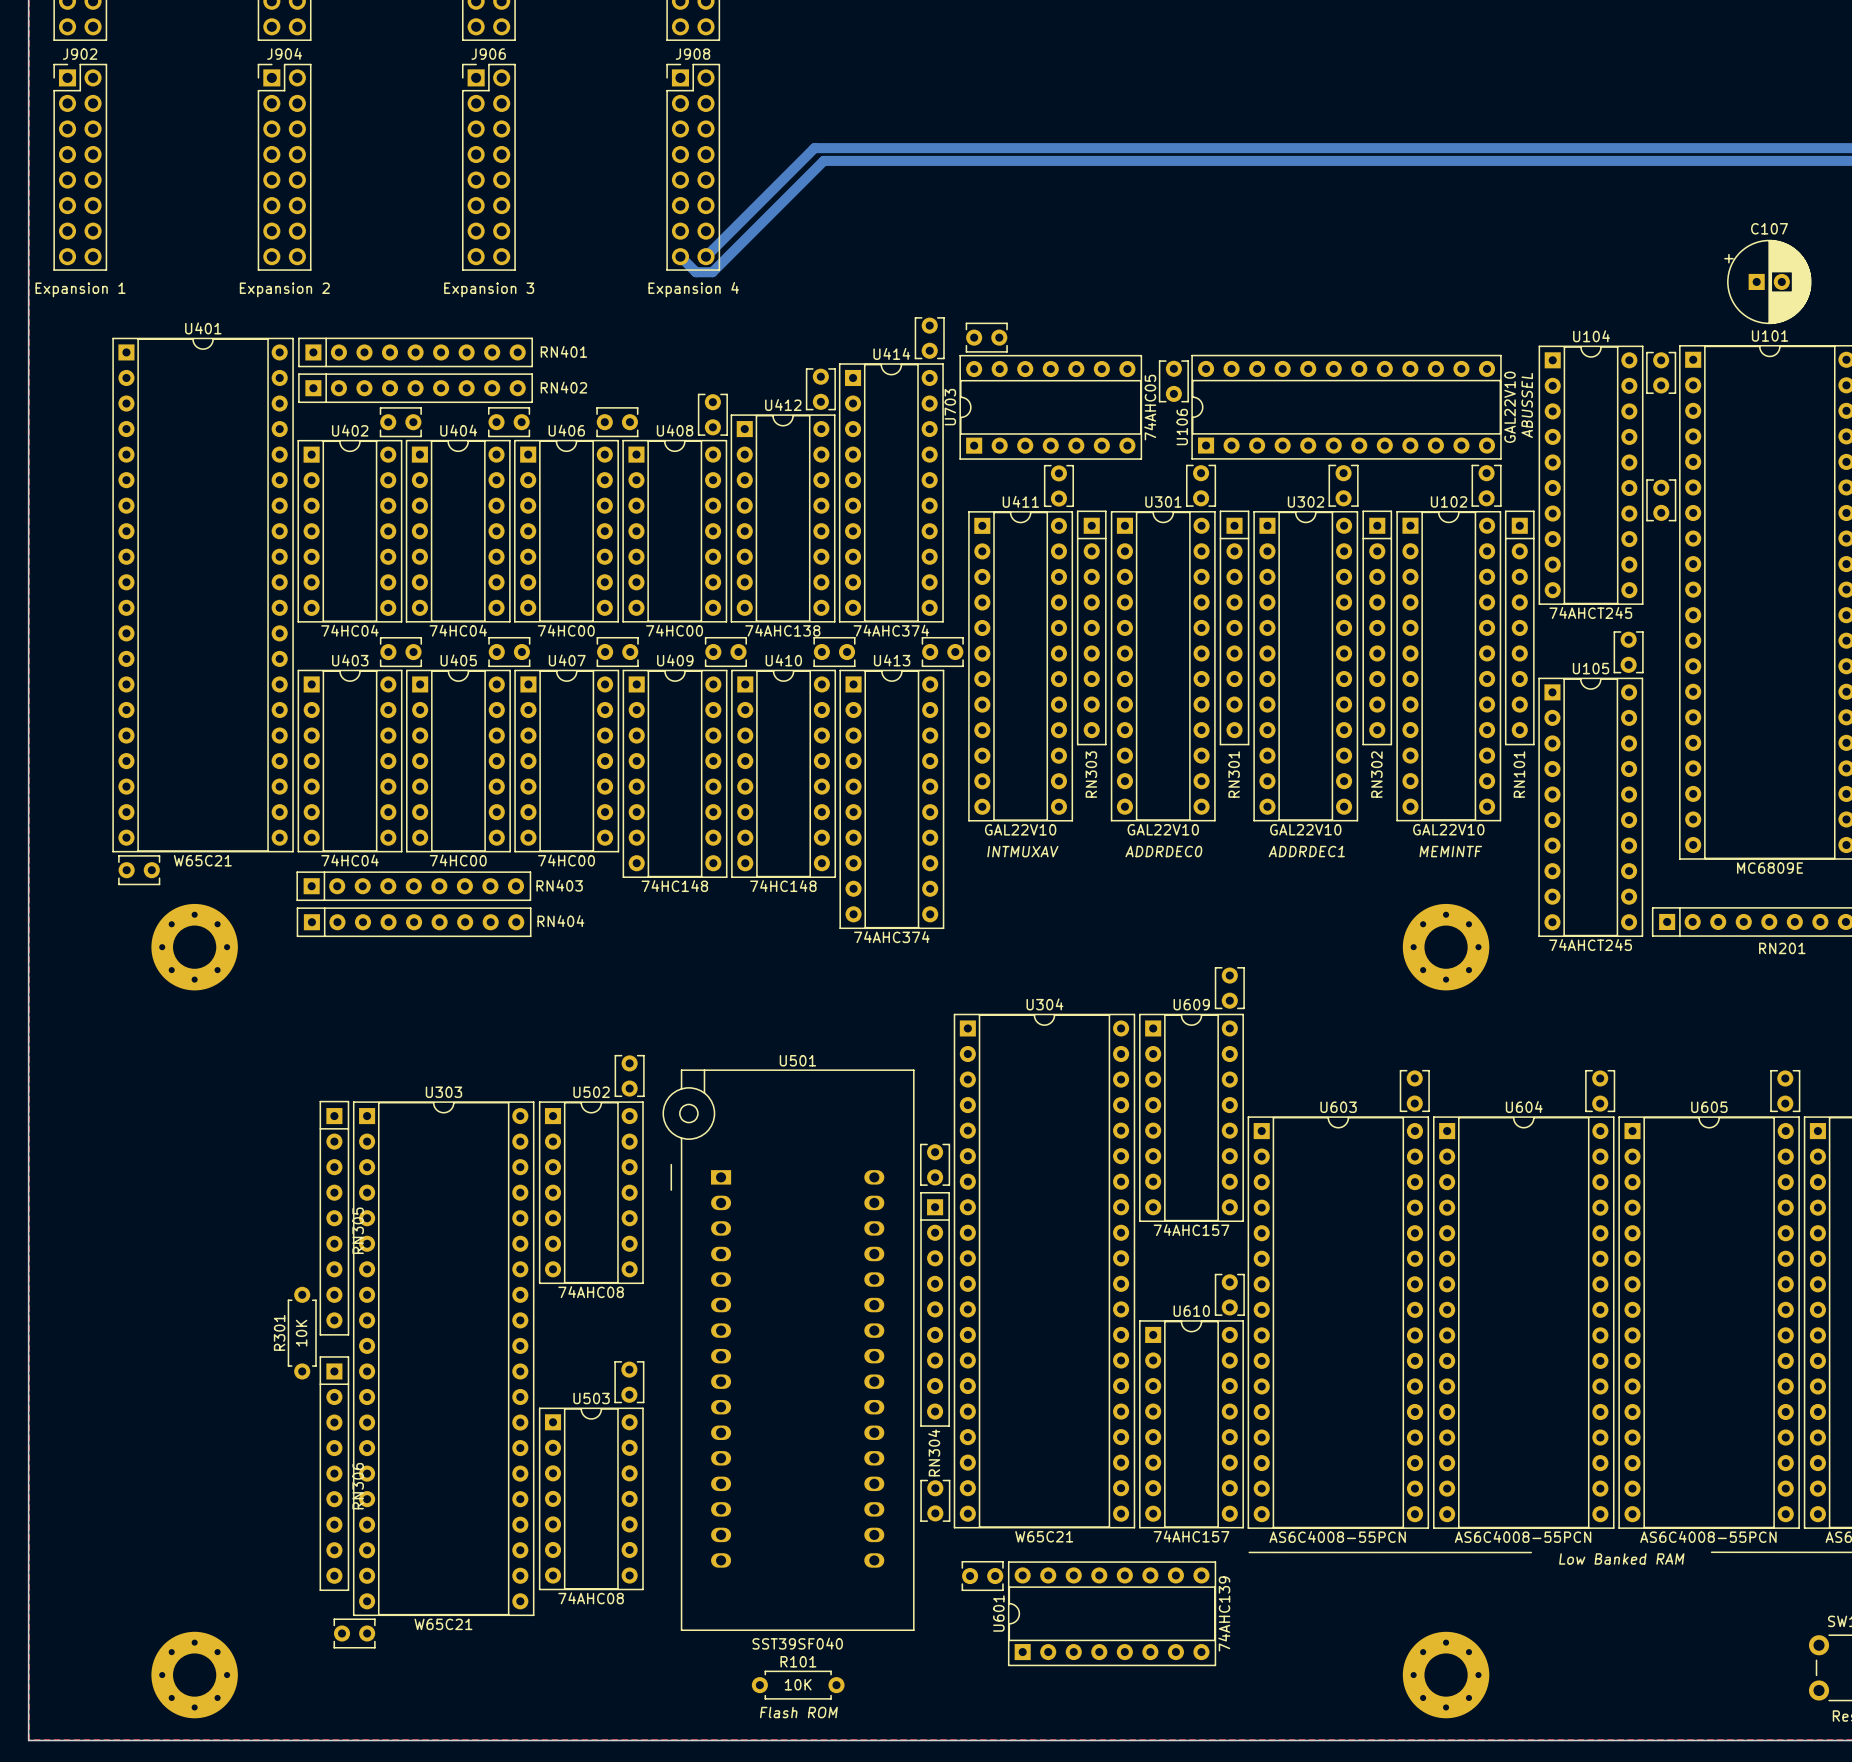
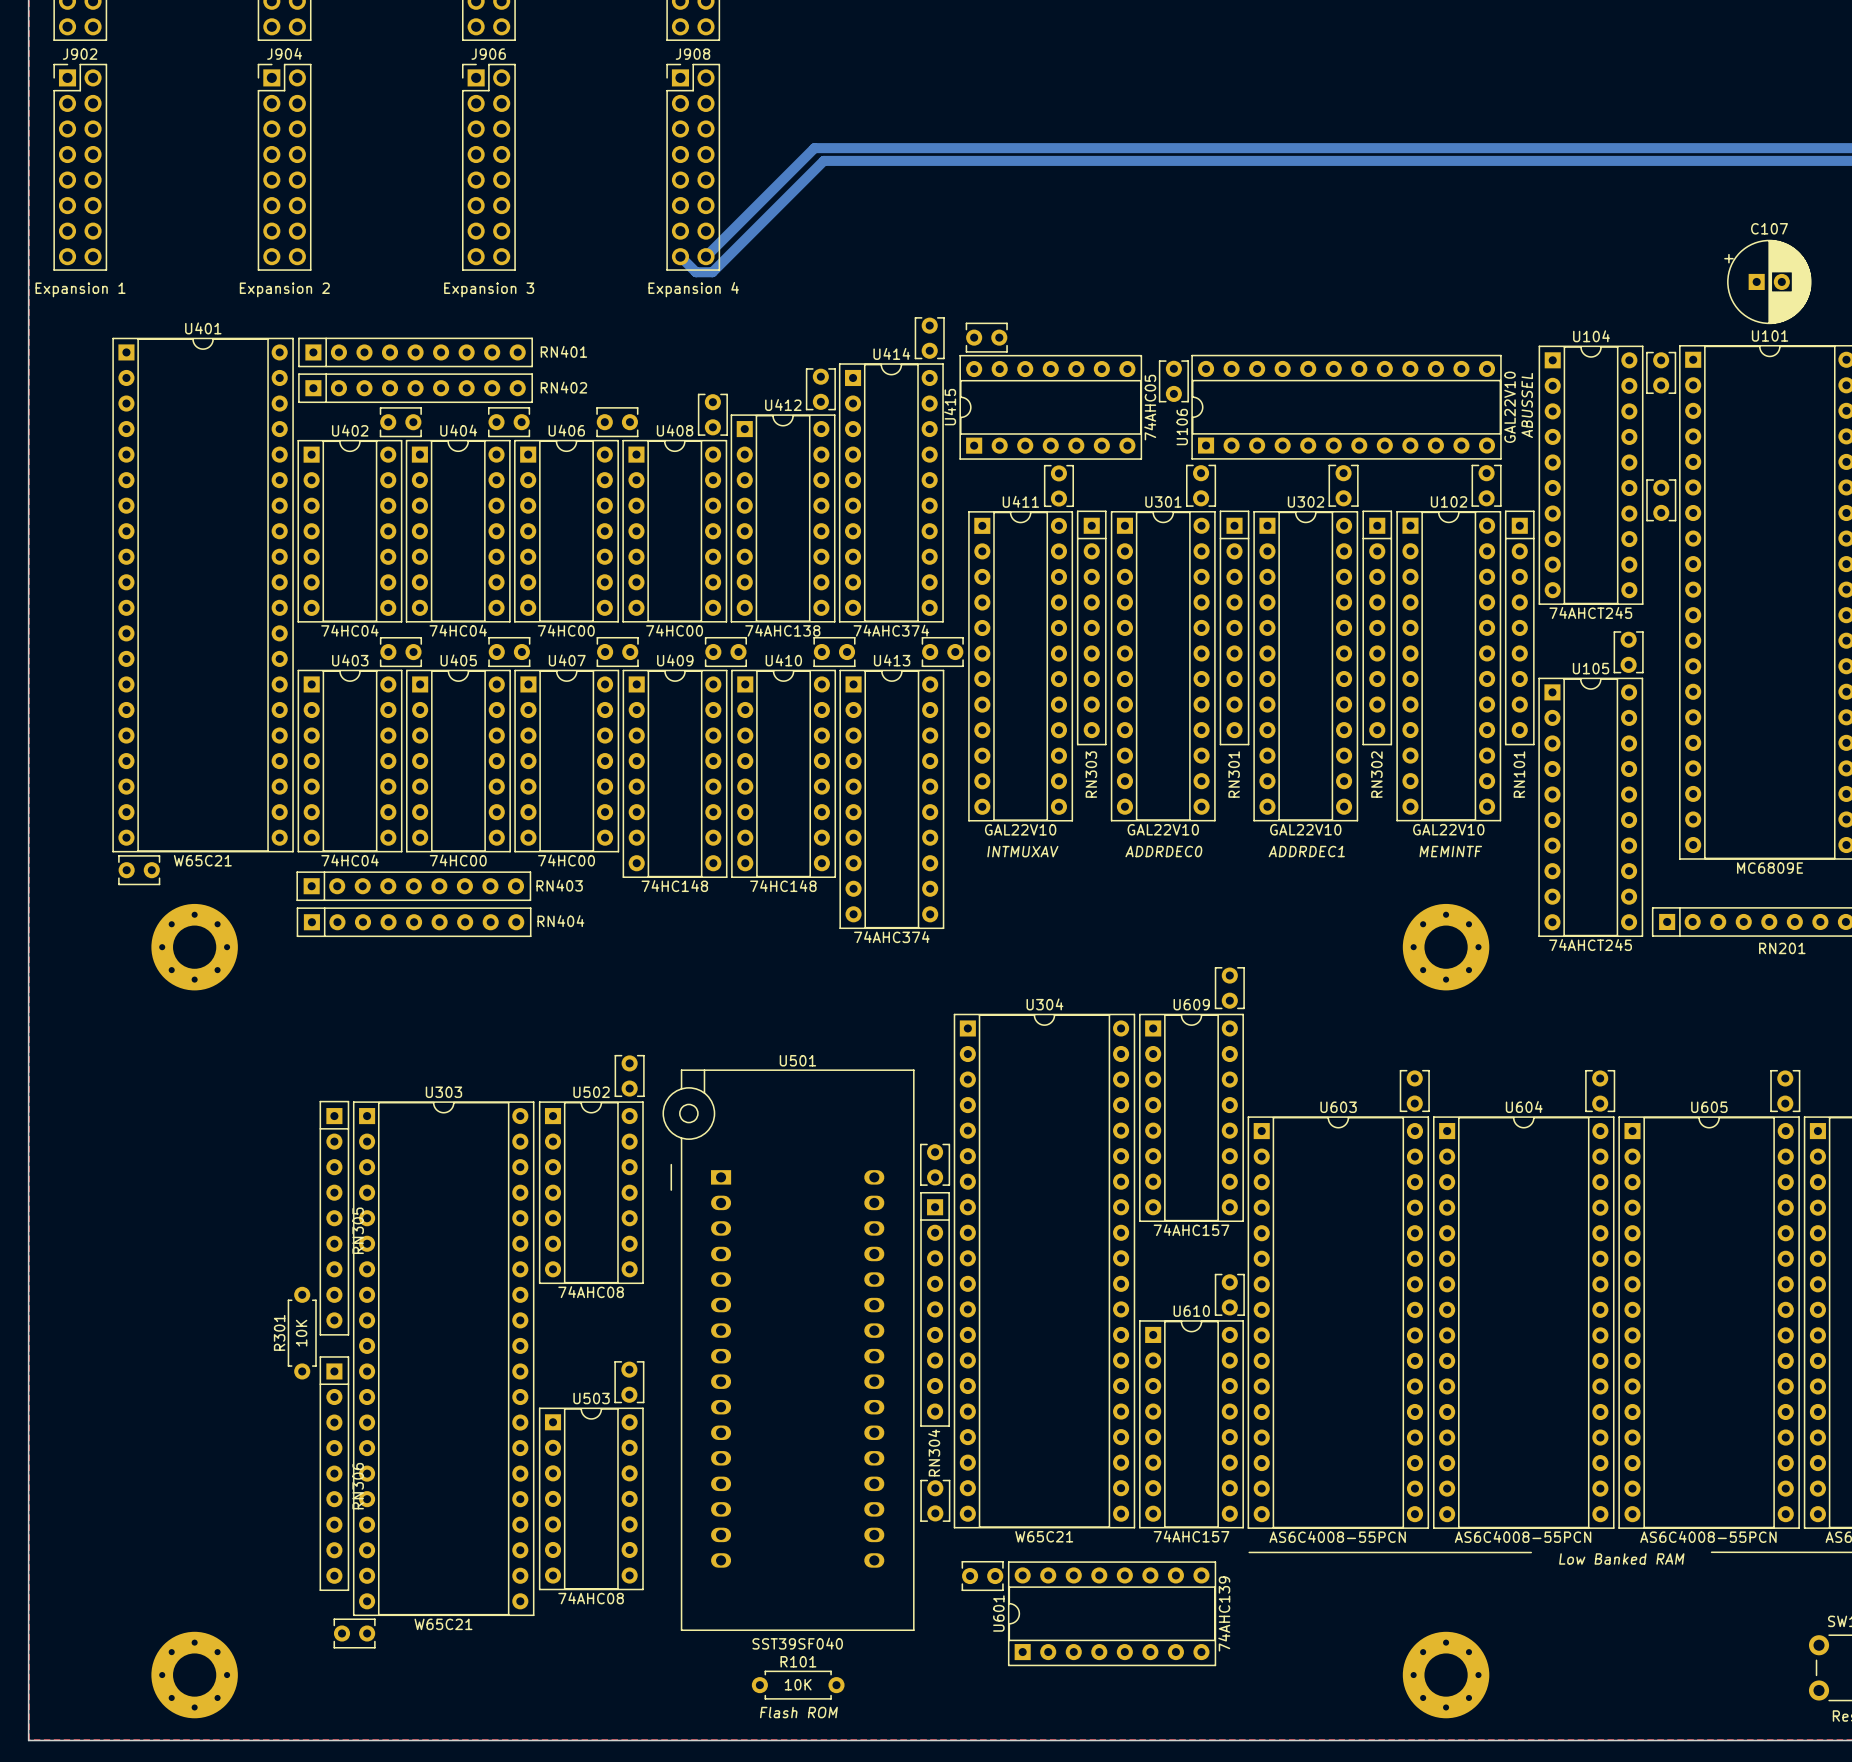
U703 name: U703 (950, 407) -> U415 (950, 407)

